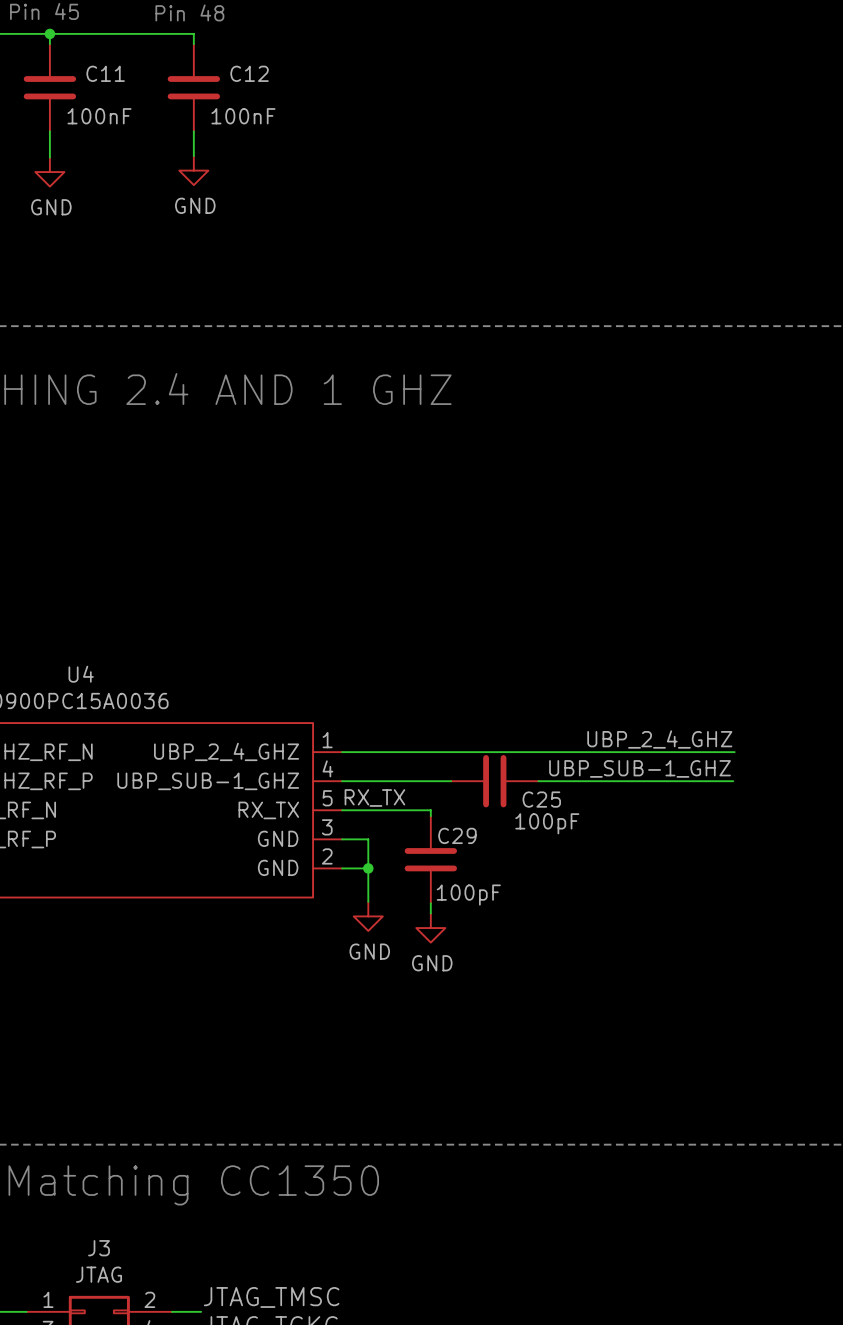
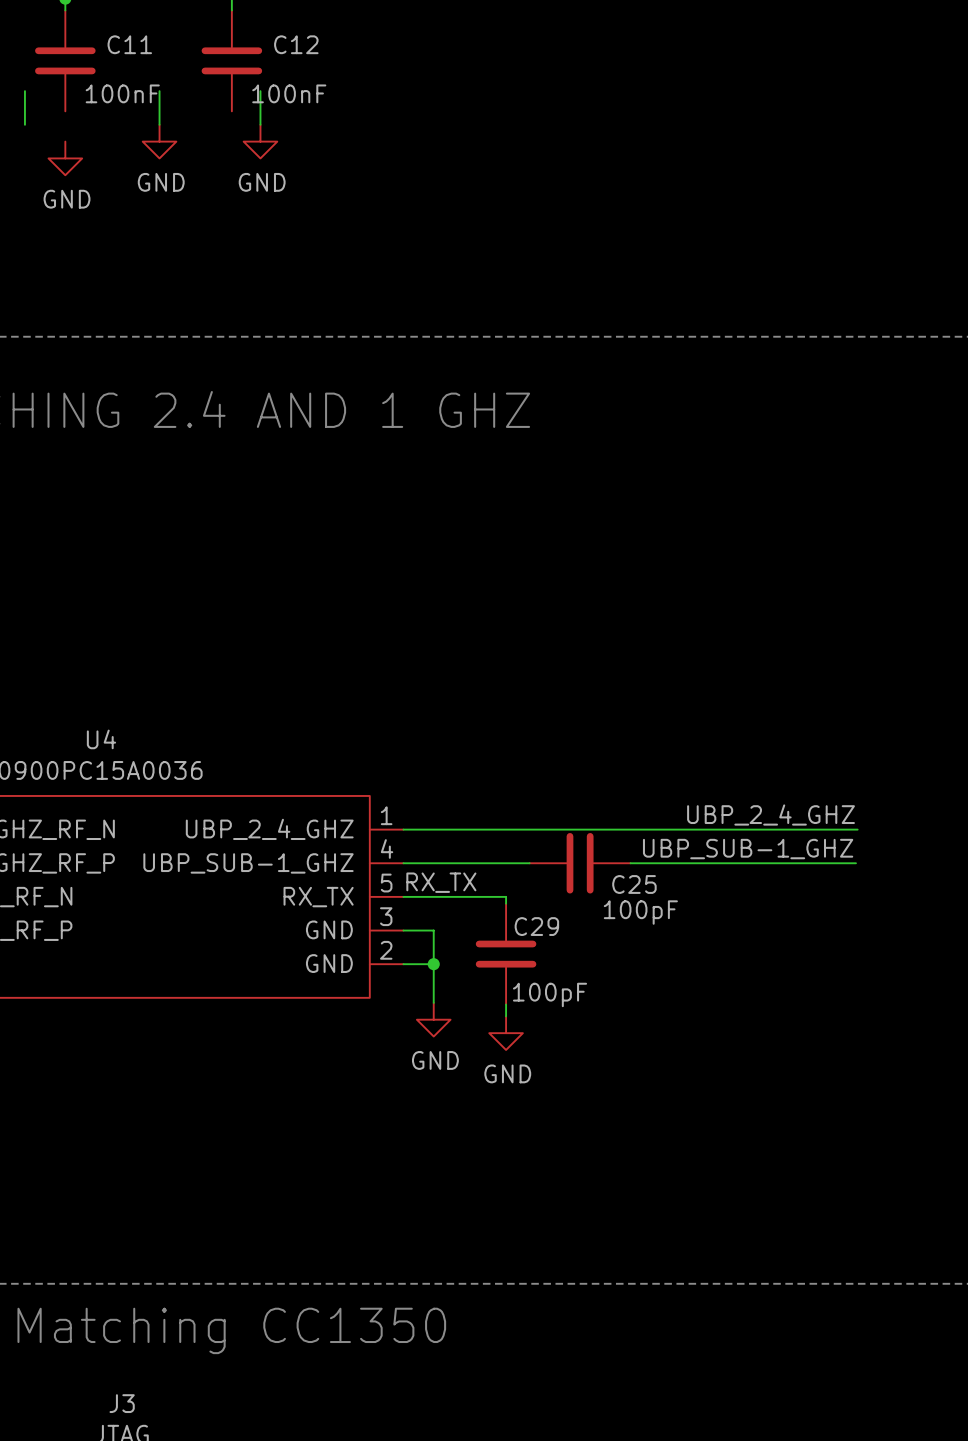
wire: none -> (24, 91) (24, 124)
wire: none -> (159, 91) (159, 124)
wire: none -> (260, 91) (260, 124)
wire: (49, 131) (49, 157) -> none
wire: (193, 131) (193, 156) -> none
power symbol: none -> GND (159, 141)
power symbol position: GND (193, 170) -> GND (260, 141)

